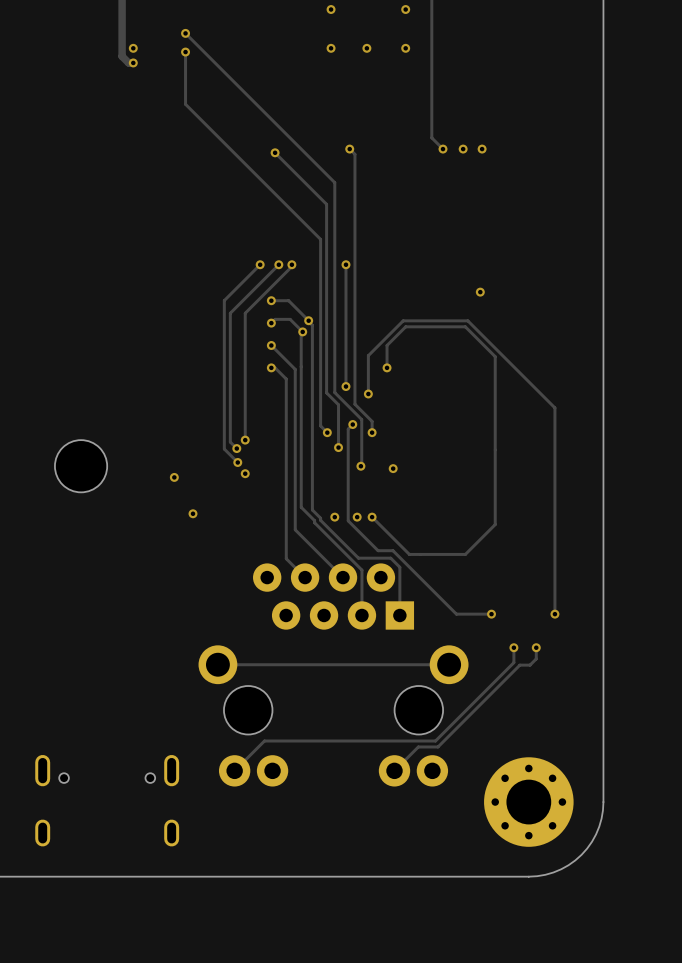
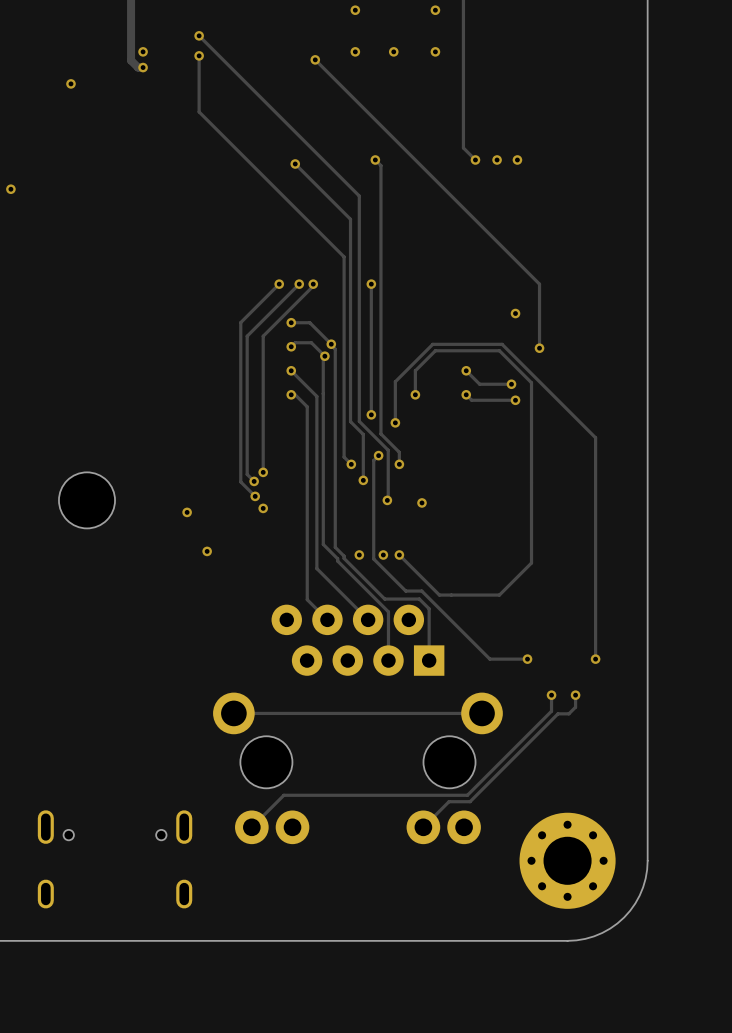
track: none -> (315, 59) (539, 284) (539, 348)
via: none -> (315, 59)
via: none -> (70, 83)
via: none -> (10, 189)
via: none -> (539, 348)
track: none -> (466, 370) (479, 384) (511, 384)
via: none -> (466, 370)
via: none -> (511, 384)
track: none -> (466, 394) (471, 400) (515, 400)
via: none -> (466, 394)
via: none -> (515, 400)

